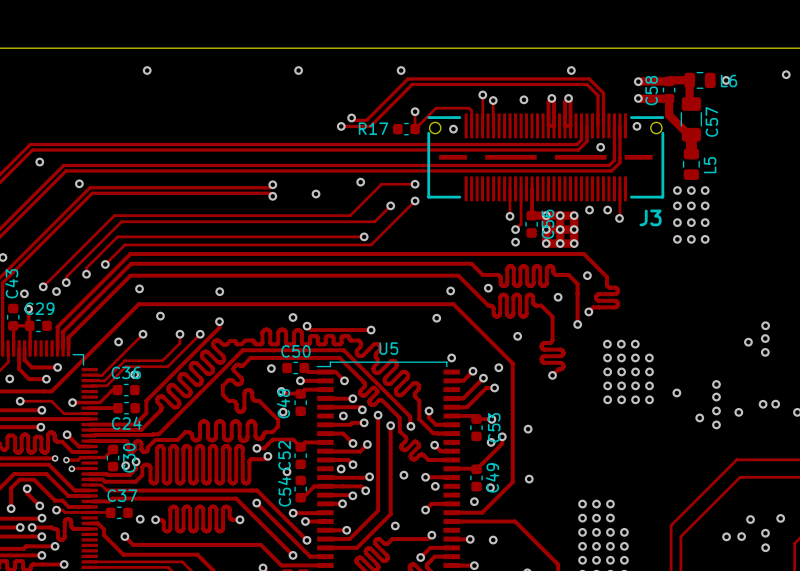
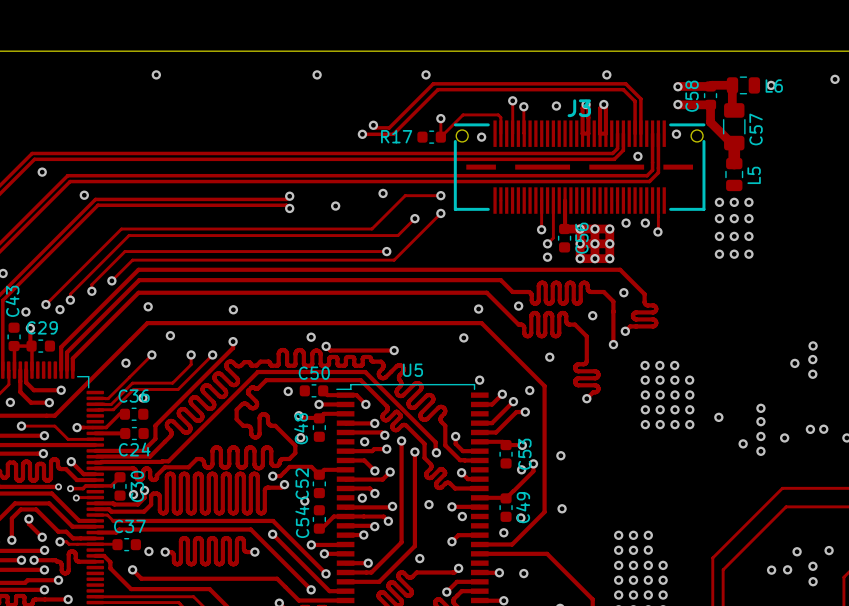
J3 name position: J3 (650, 217) -> J3 (579, 108)

